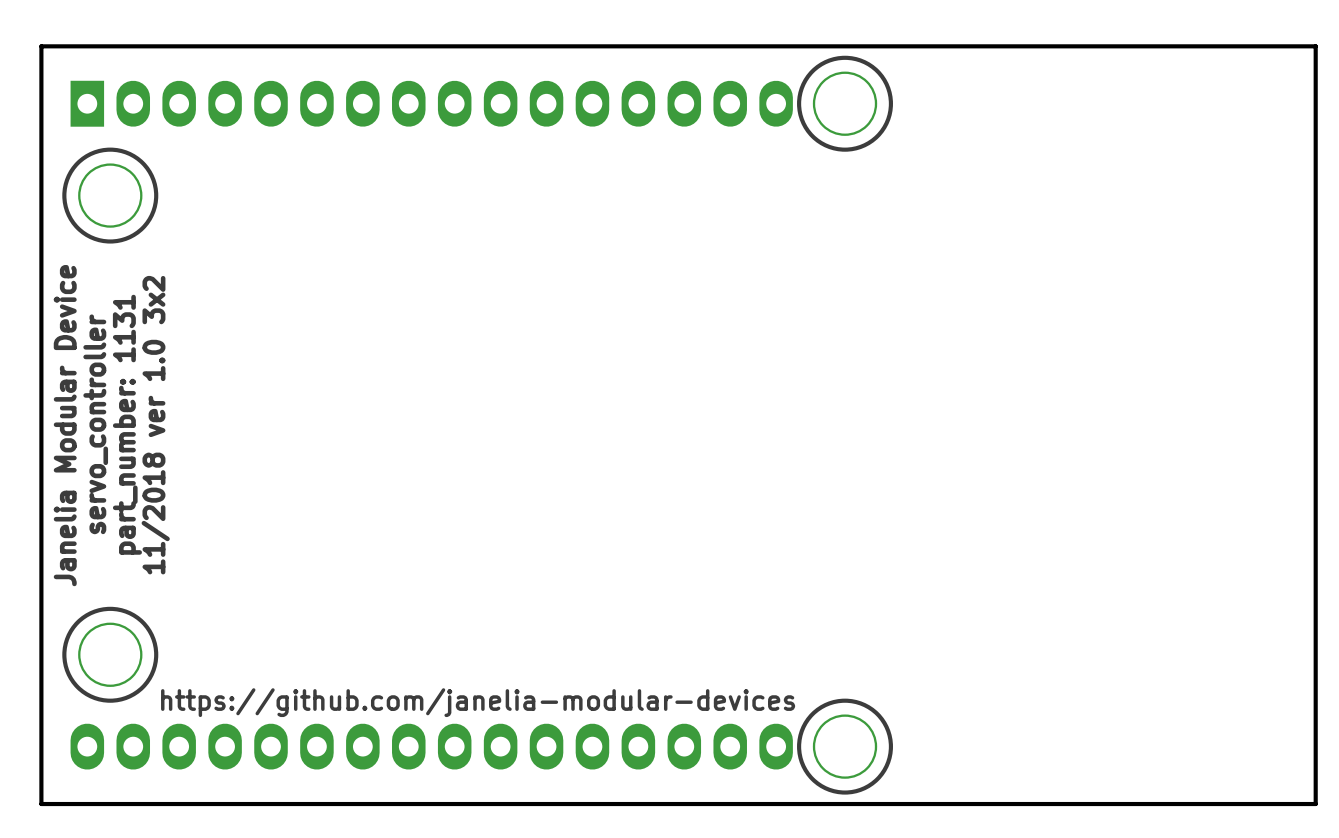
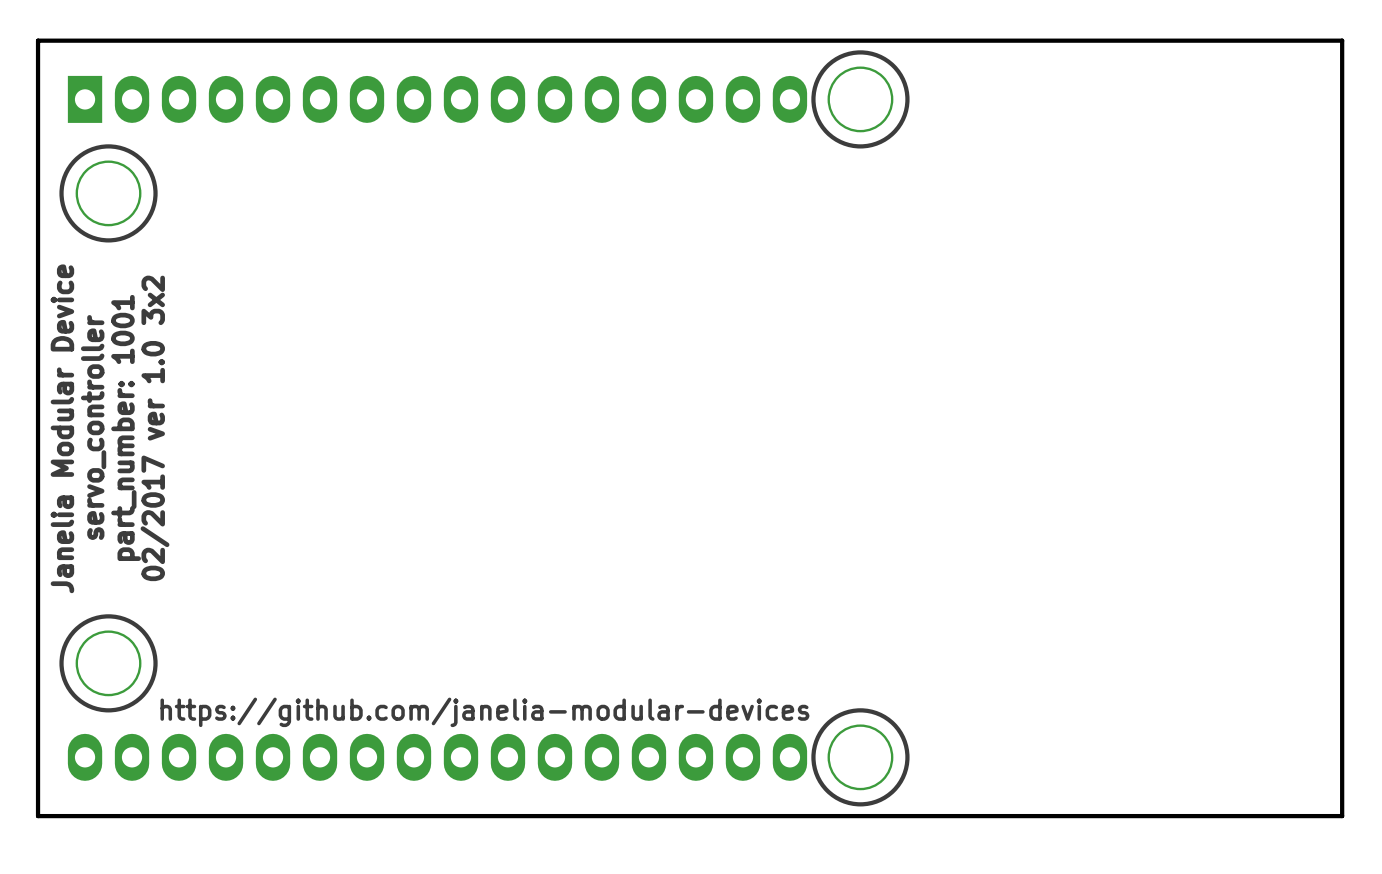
text: part_number: 1131 (127, 424) -> part_number: 1001 (126, 427)
text: 11/2018 ver 1.0 3x2 (155, 425) -> 02/2017 ver 1.0 3x2 (155, 428)

